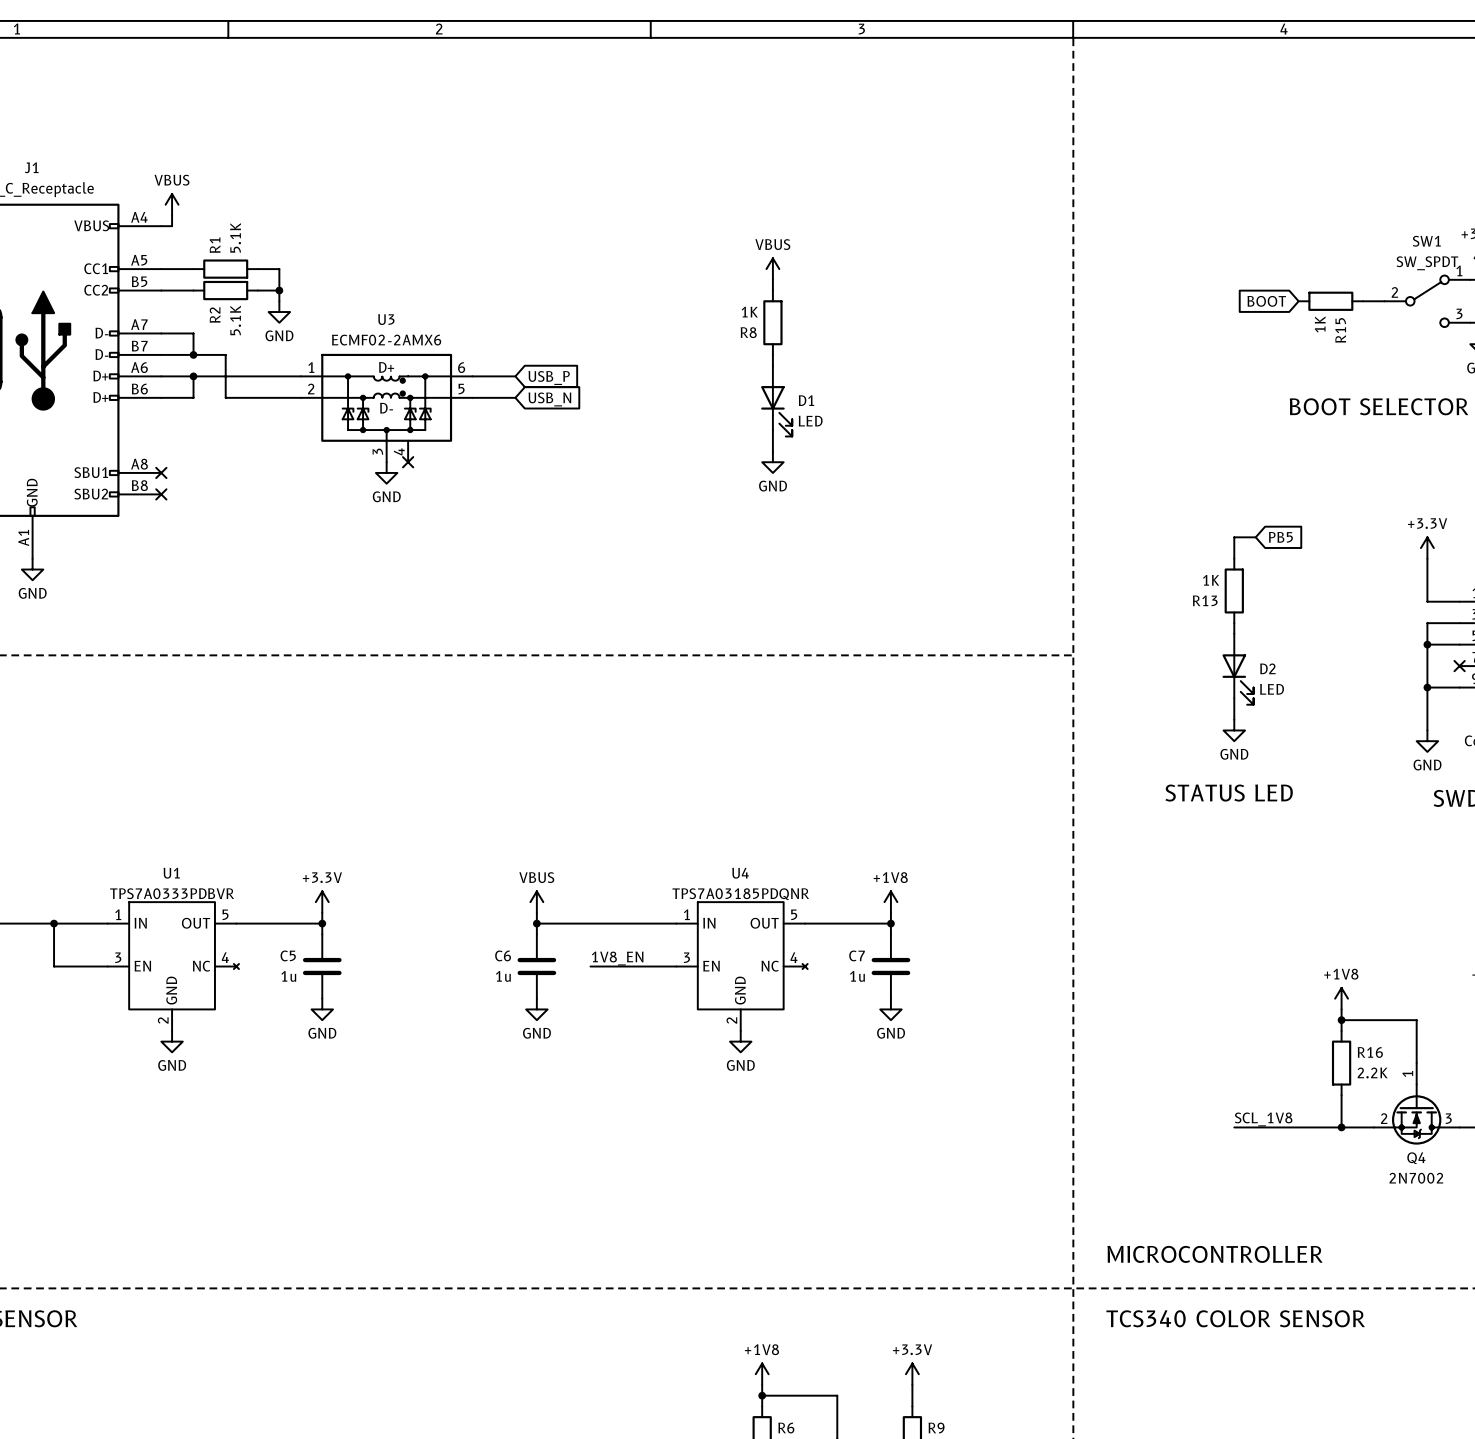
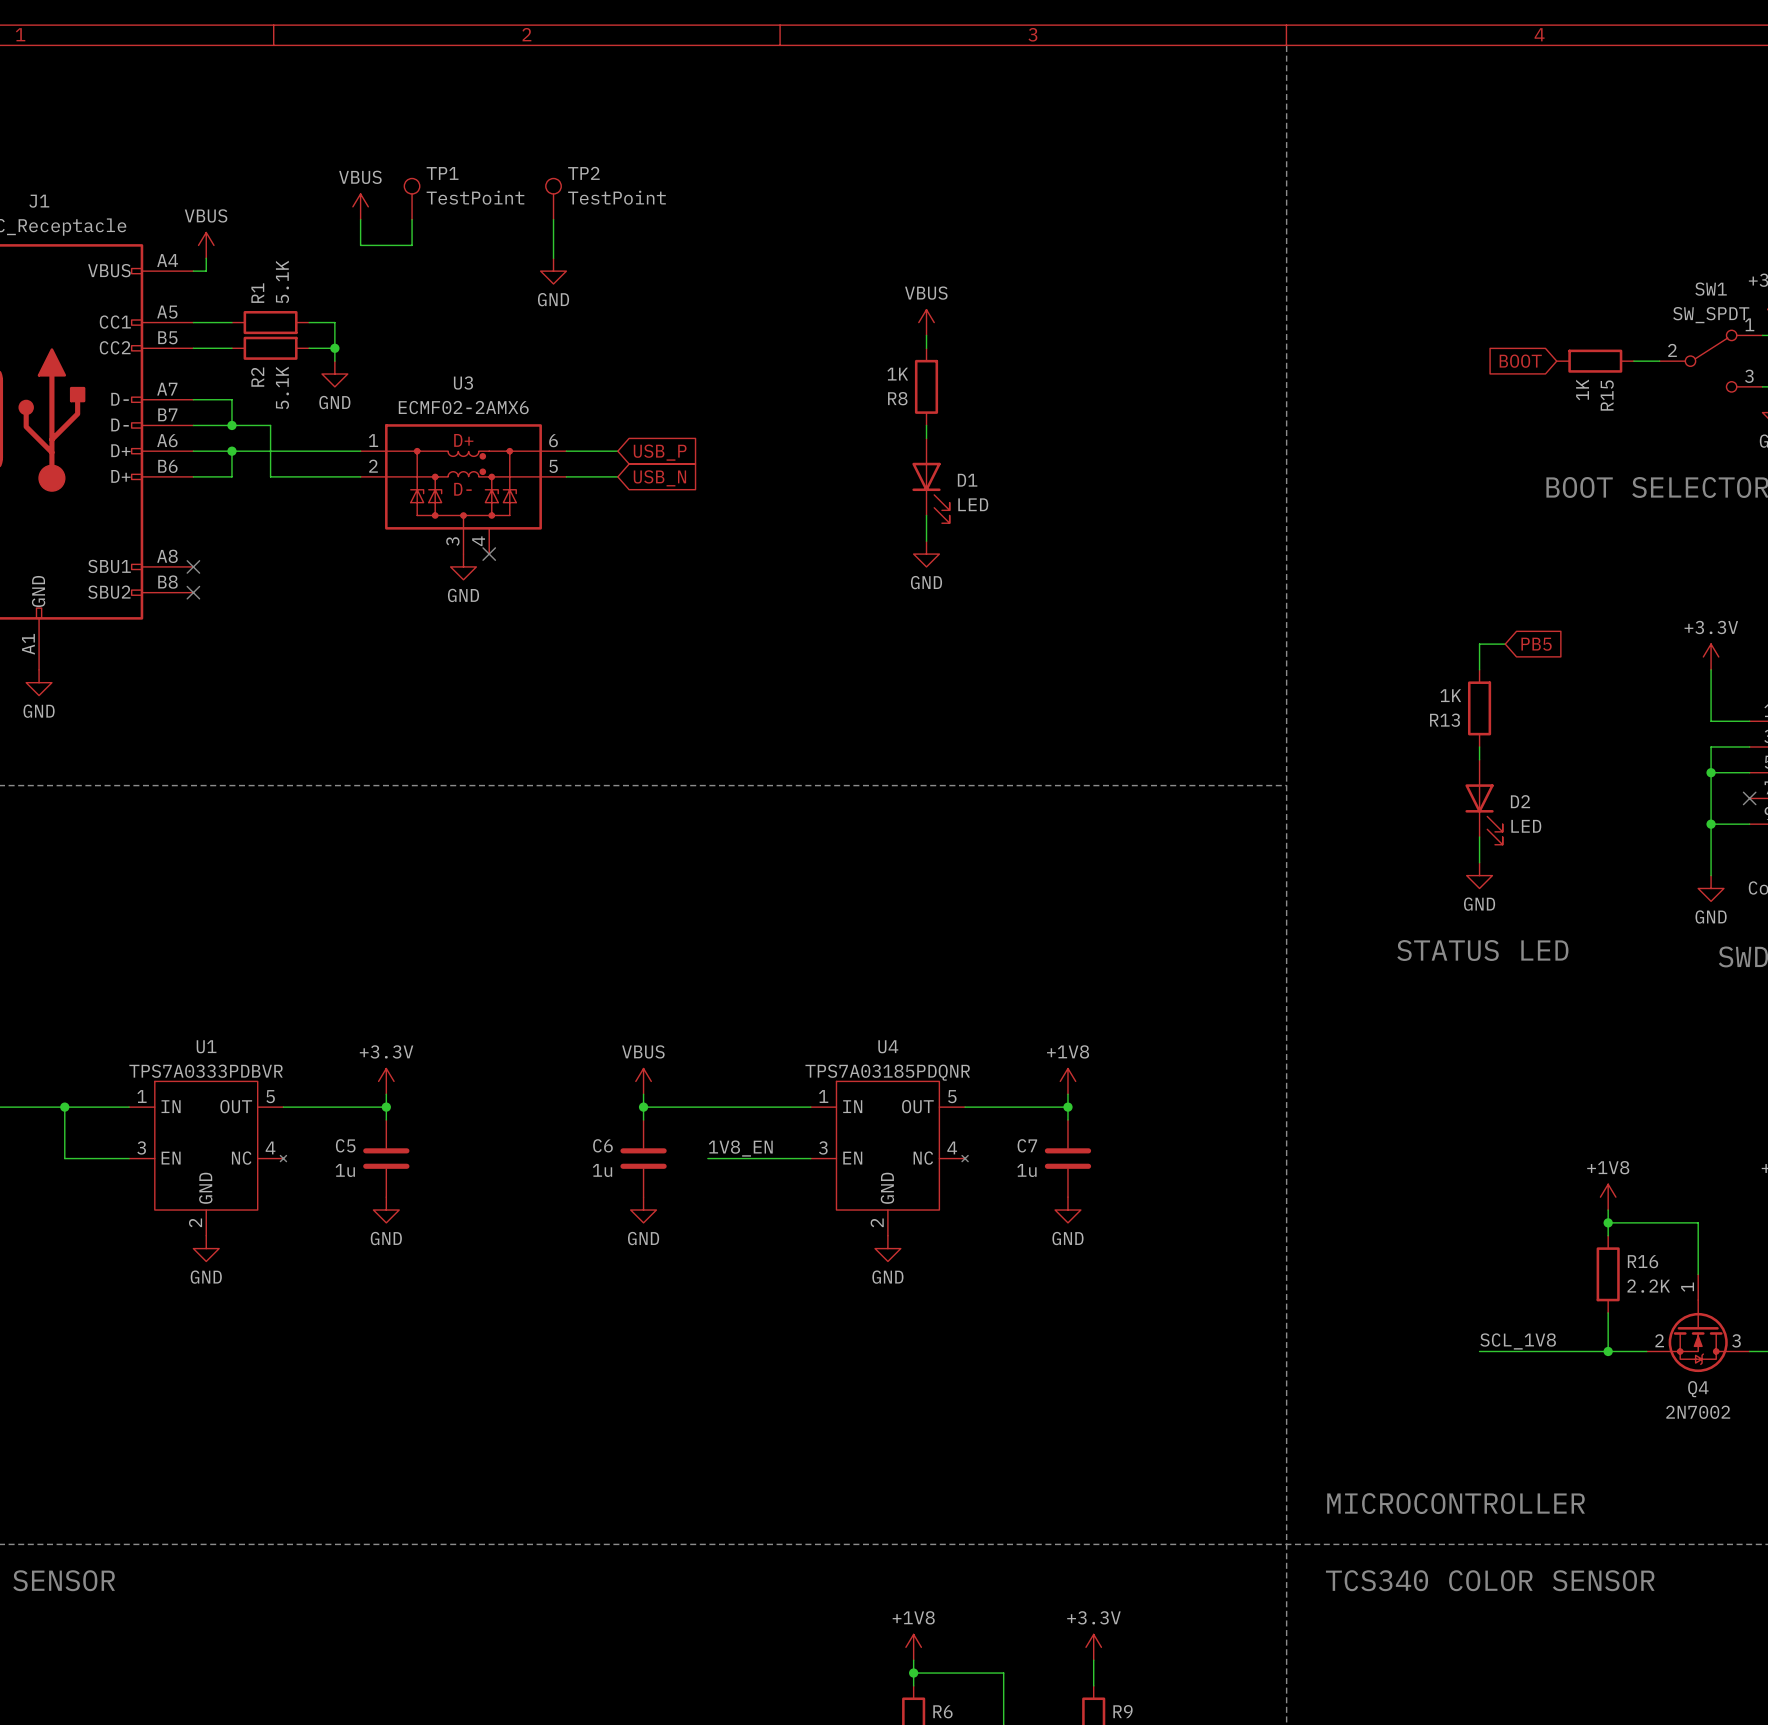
TP1: none -> TestPoint (412, 199)
TP2: none -> TestPoint (553, 199)
power symbol: none -> VBUS (360, 206)
wire: none -> (360, 219) (360, 245) (412, 245) (412, 219)
wire: none -> (553, 219) (553, 258)
power symbol: none -> GND (553, 271)

